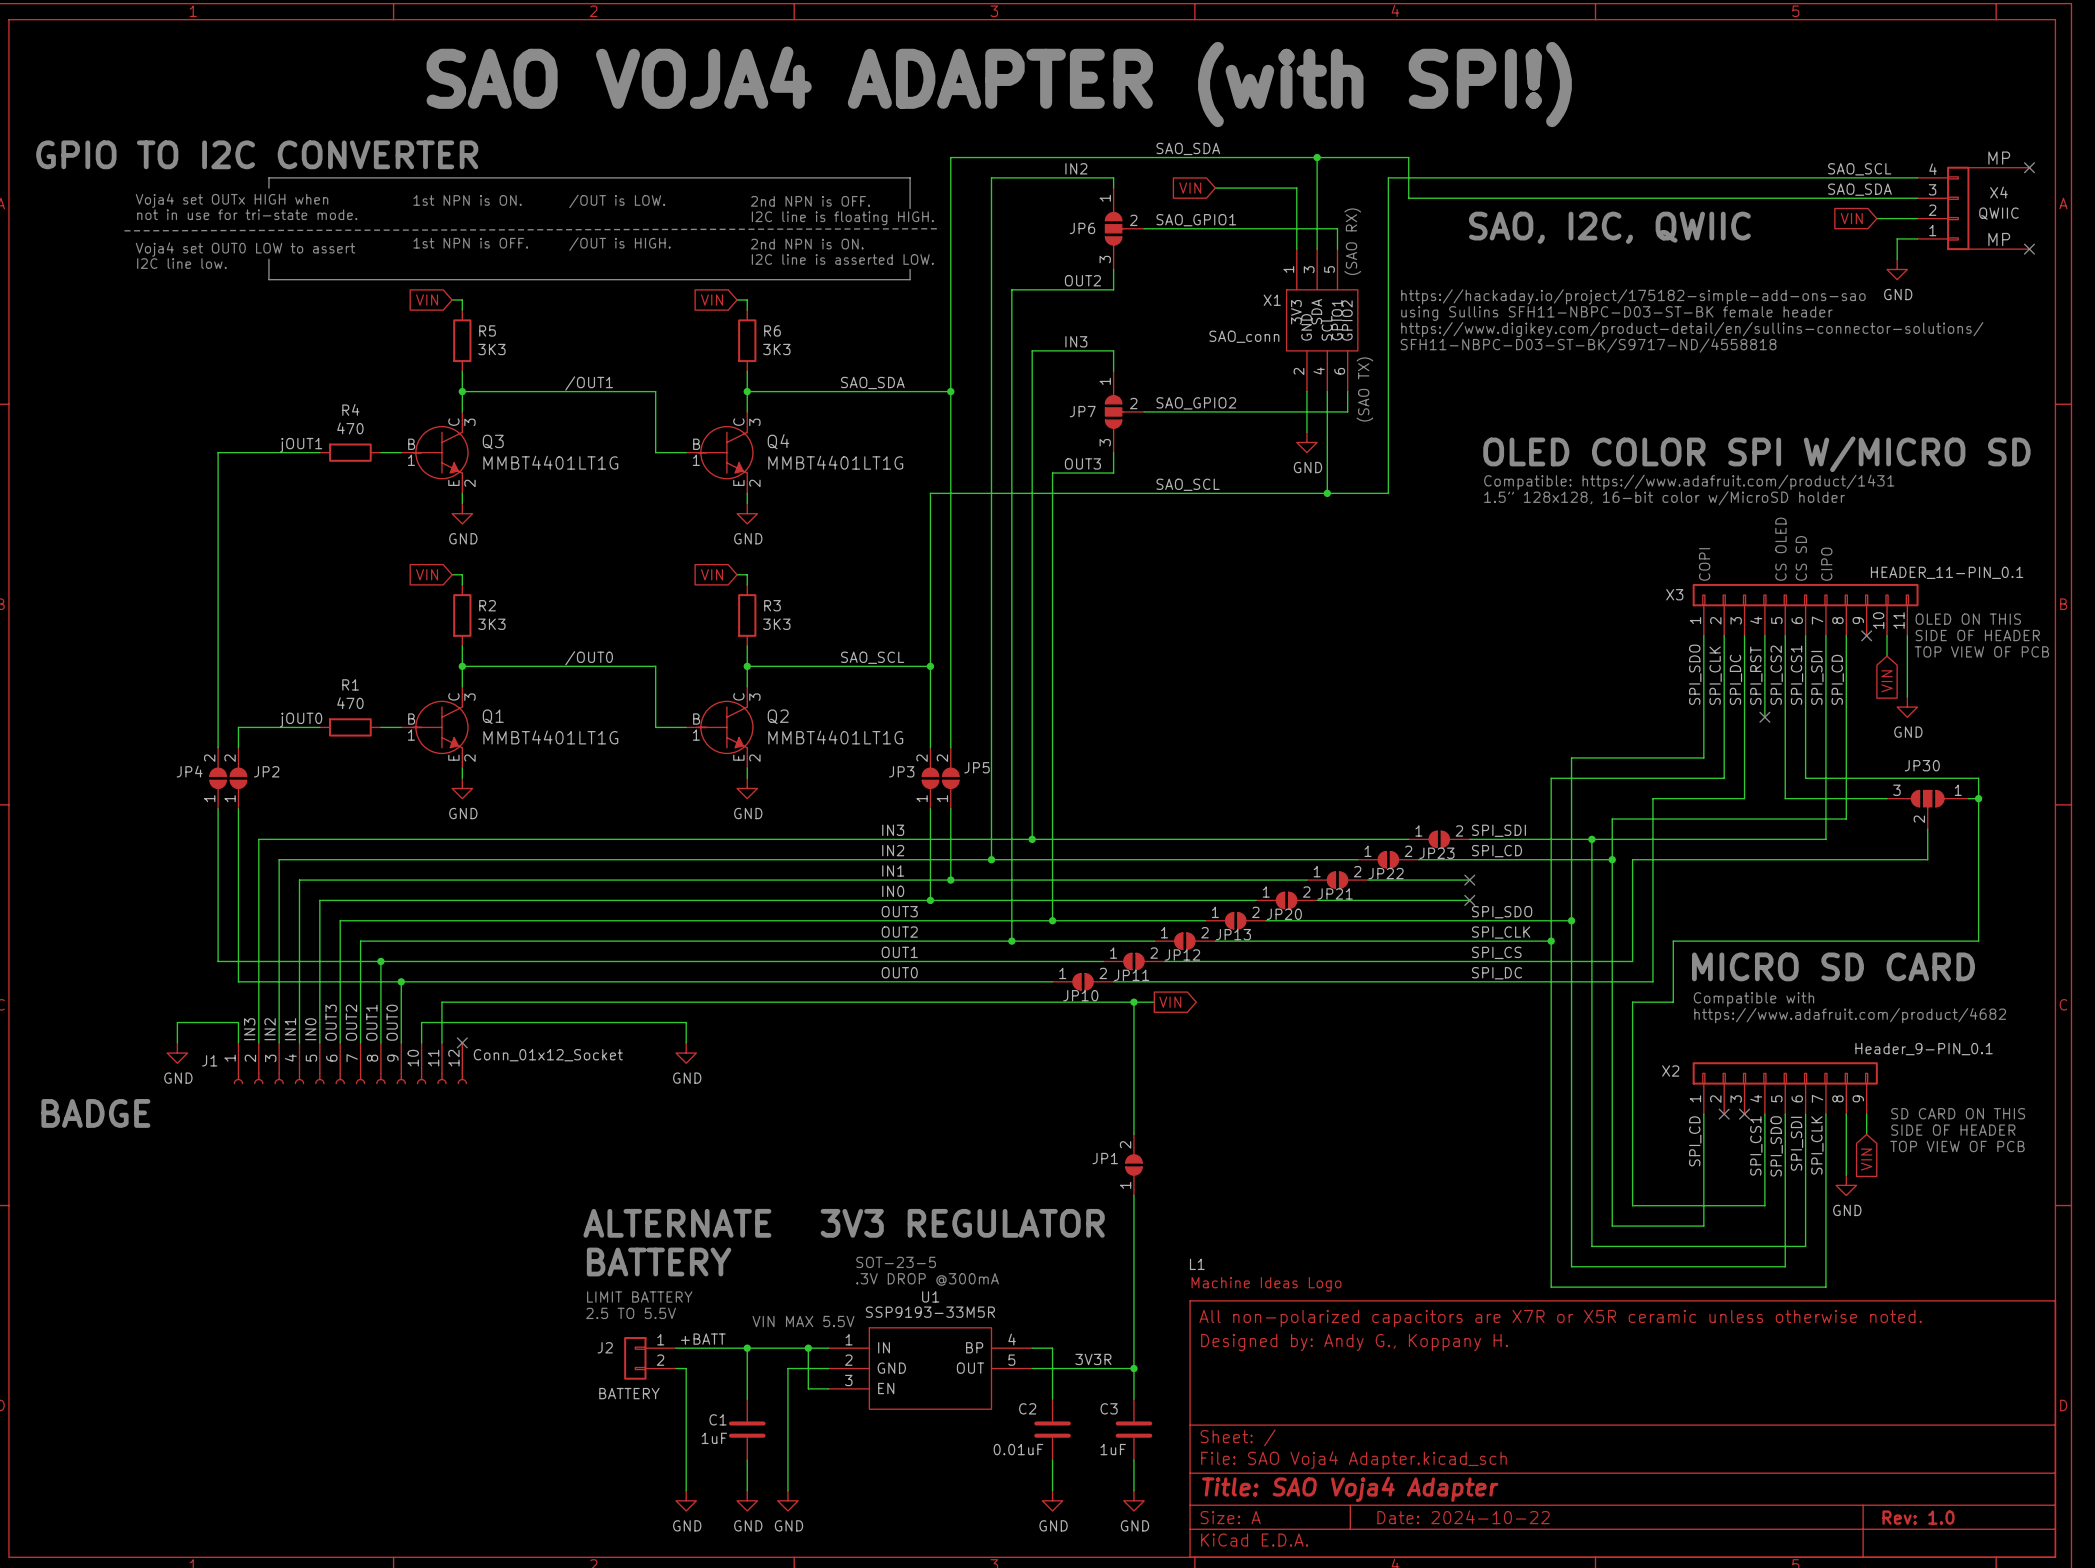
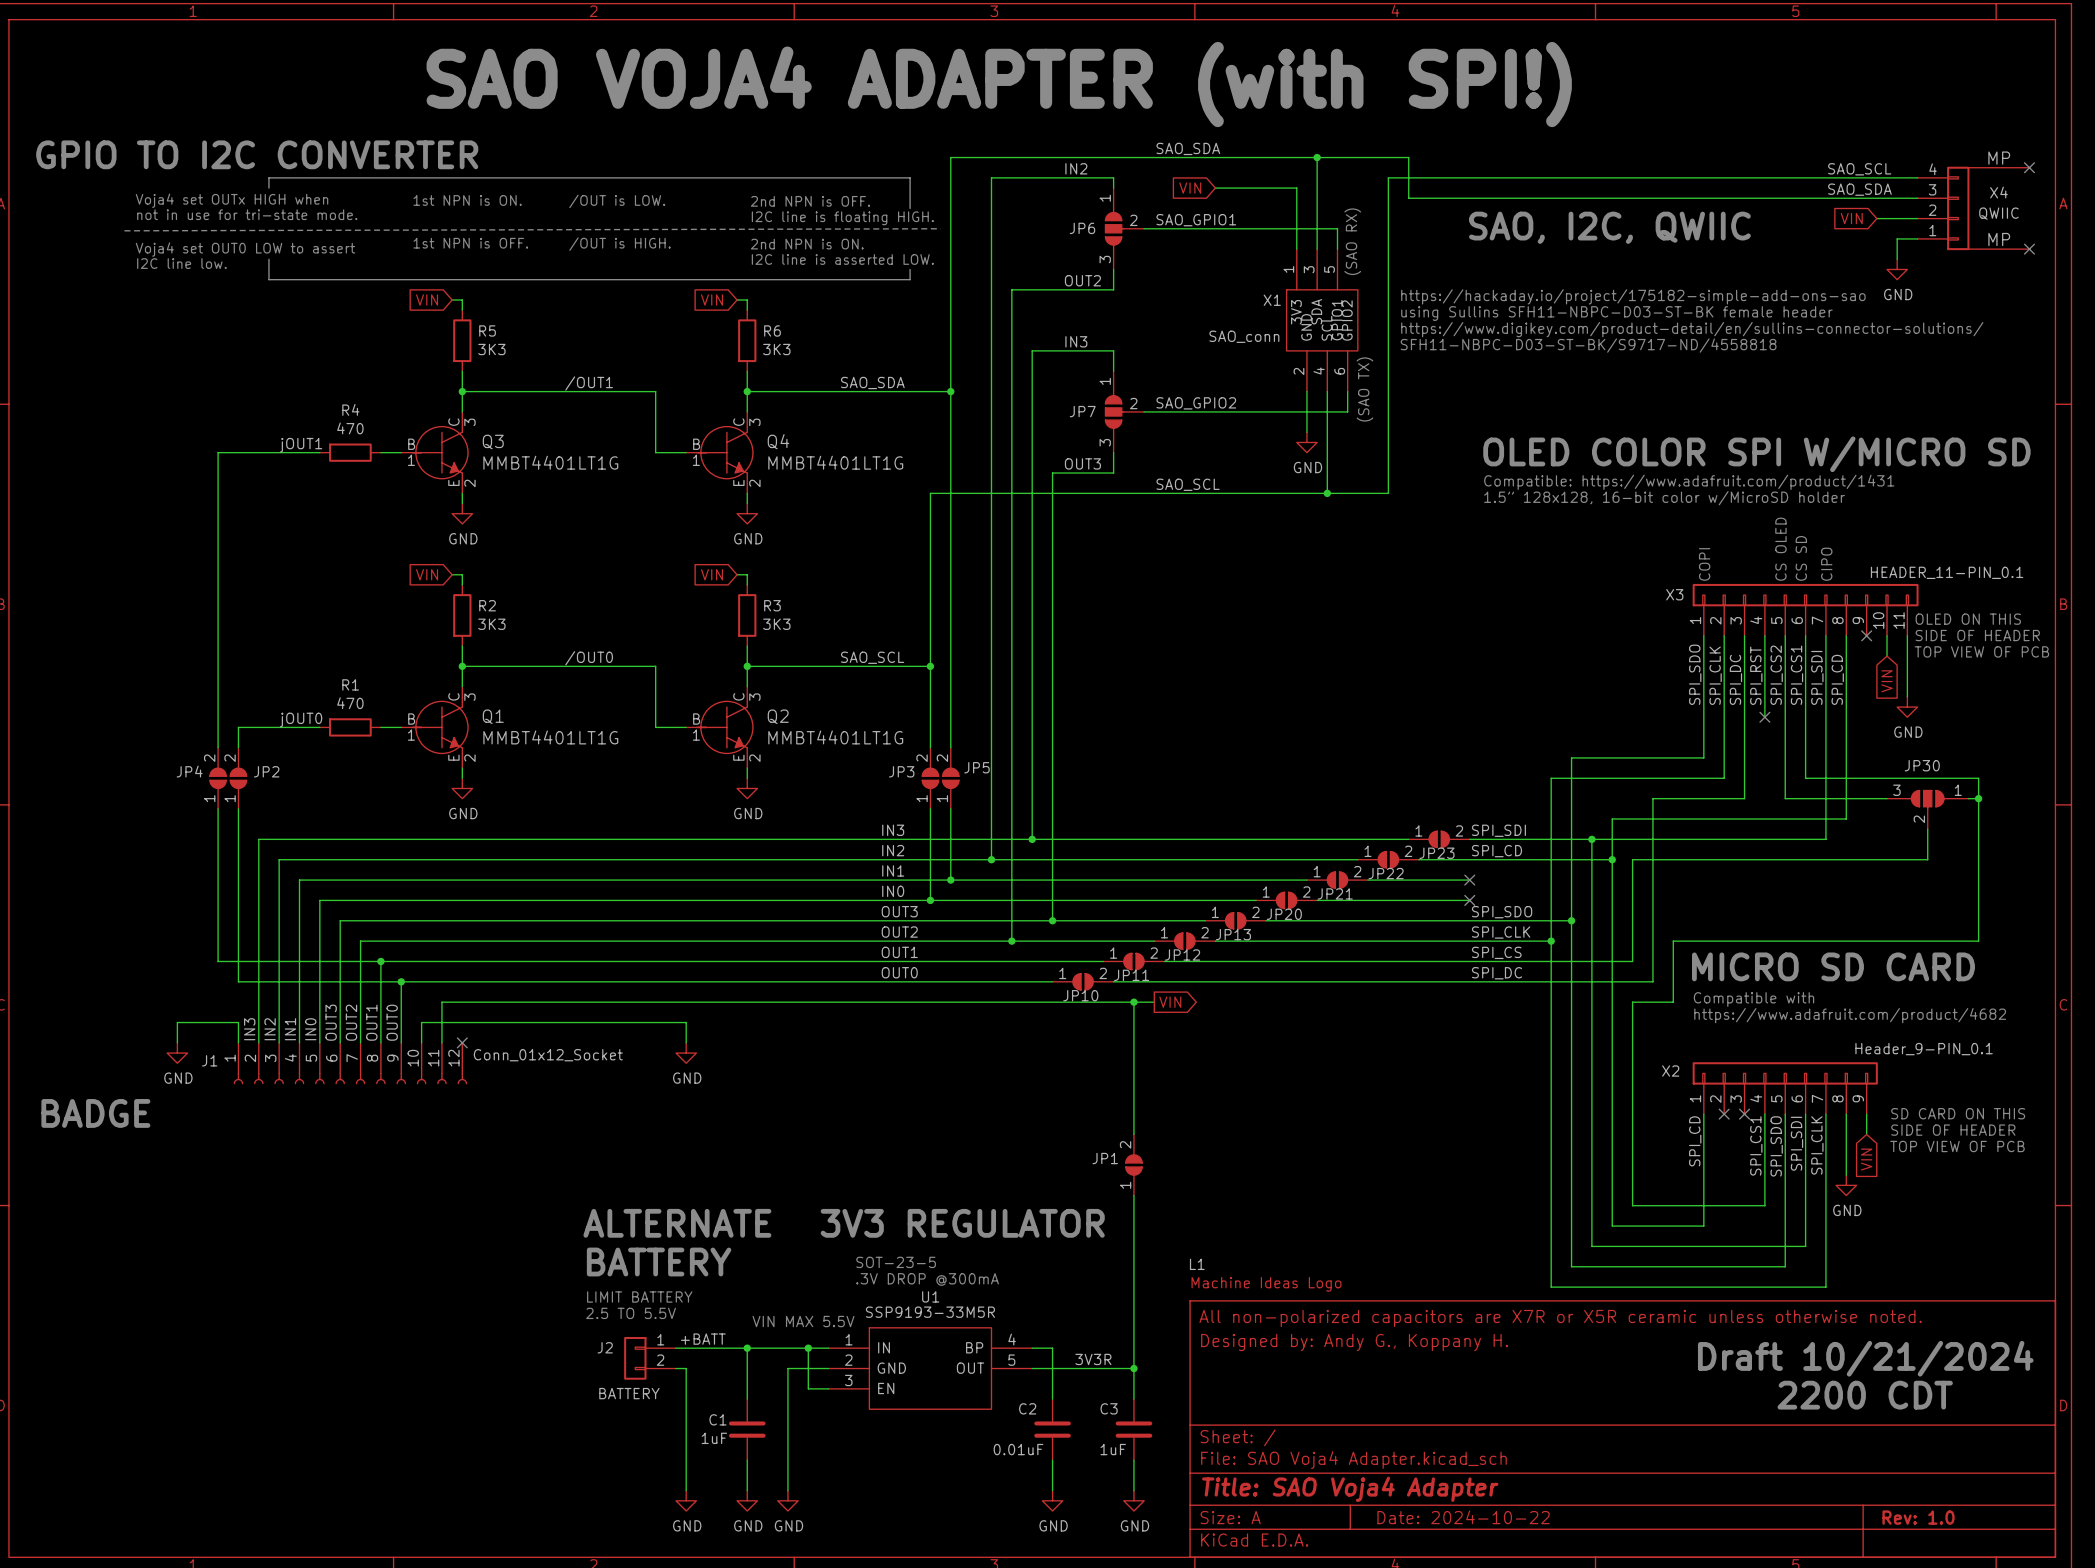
text: none -> Draft 10/21/2024 (1865, 1358)
text: none -> 2200 CDT (1865, 1395)

